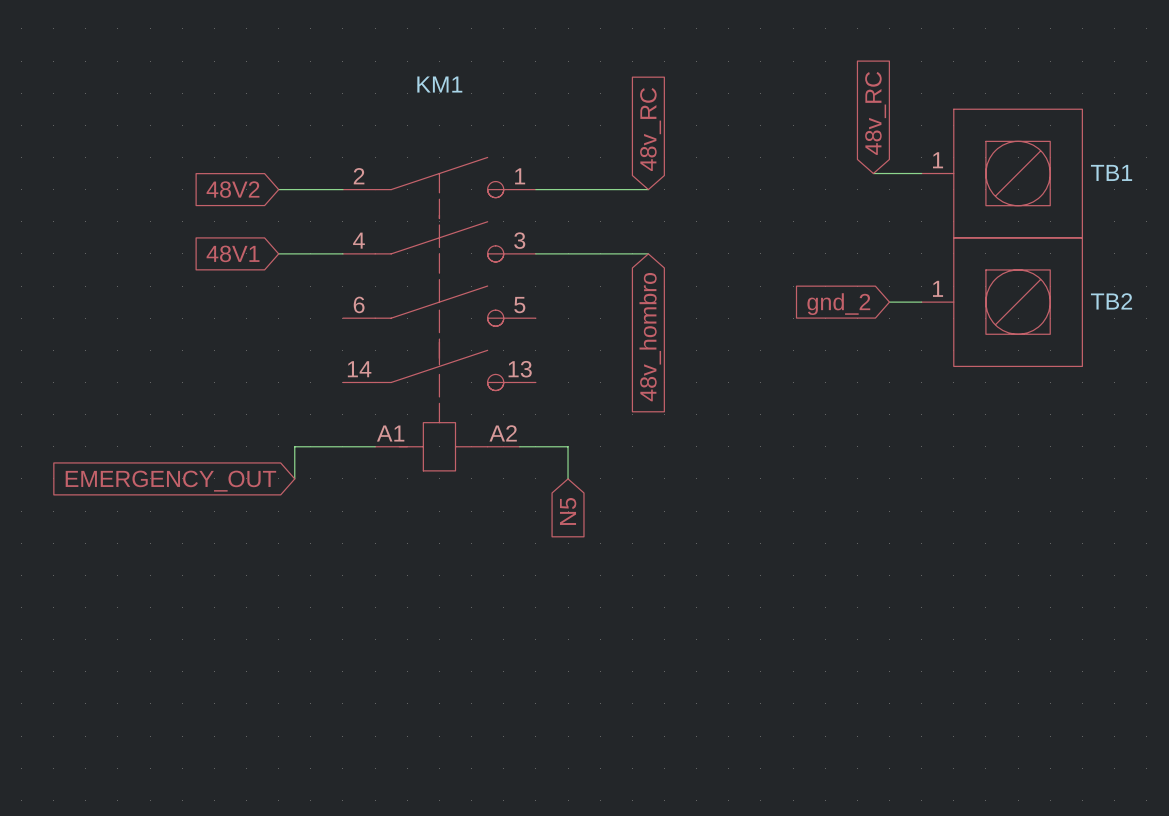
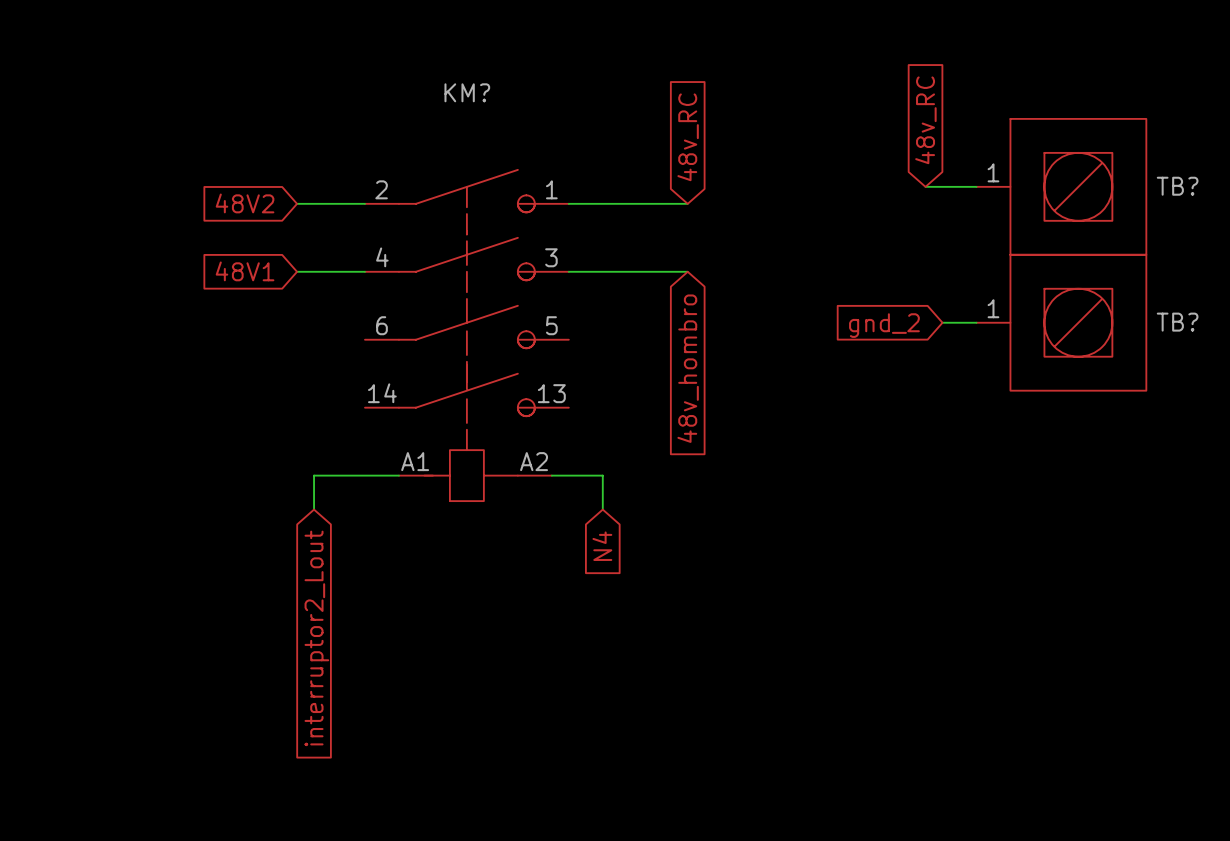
KM1 name: KM1 (439, 84) -> KM? (467, 92)
TB1 name: TB1 (1111, 172) -> TB? (1177, 186)
TB2 name: TB2 (1111, 301) -> TB? (1177, 322)
global label: EMERGENCY_OUT (170, 481) -> interruptor2_Lout (316, 638)
global label: N5 (568, 511) -> N4 (602, 546)

